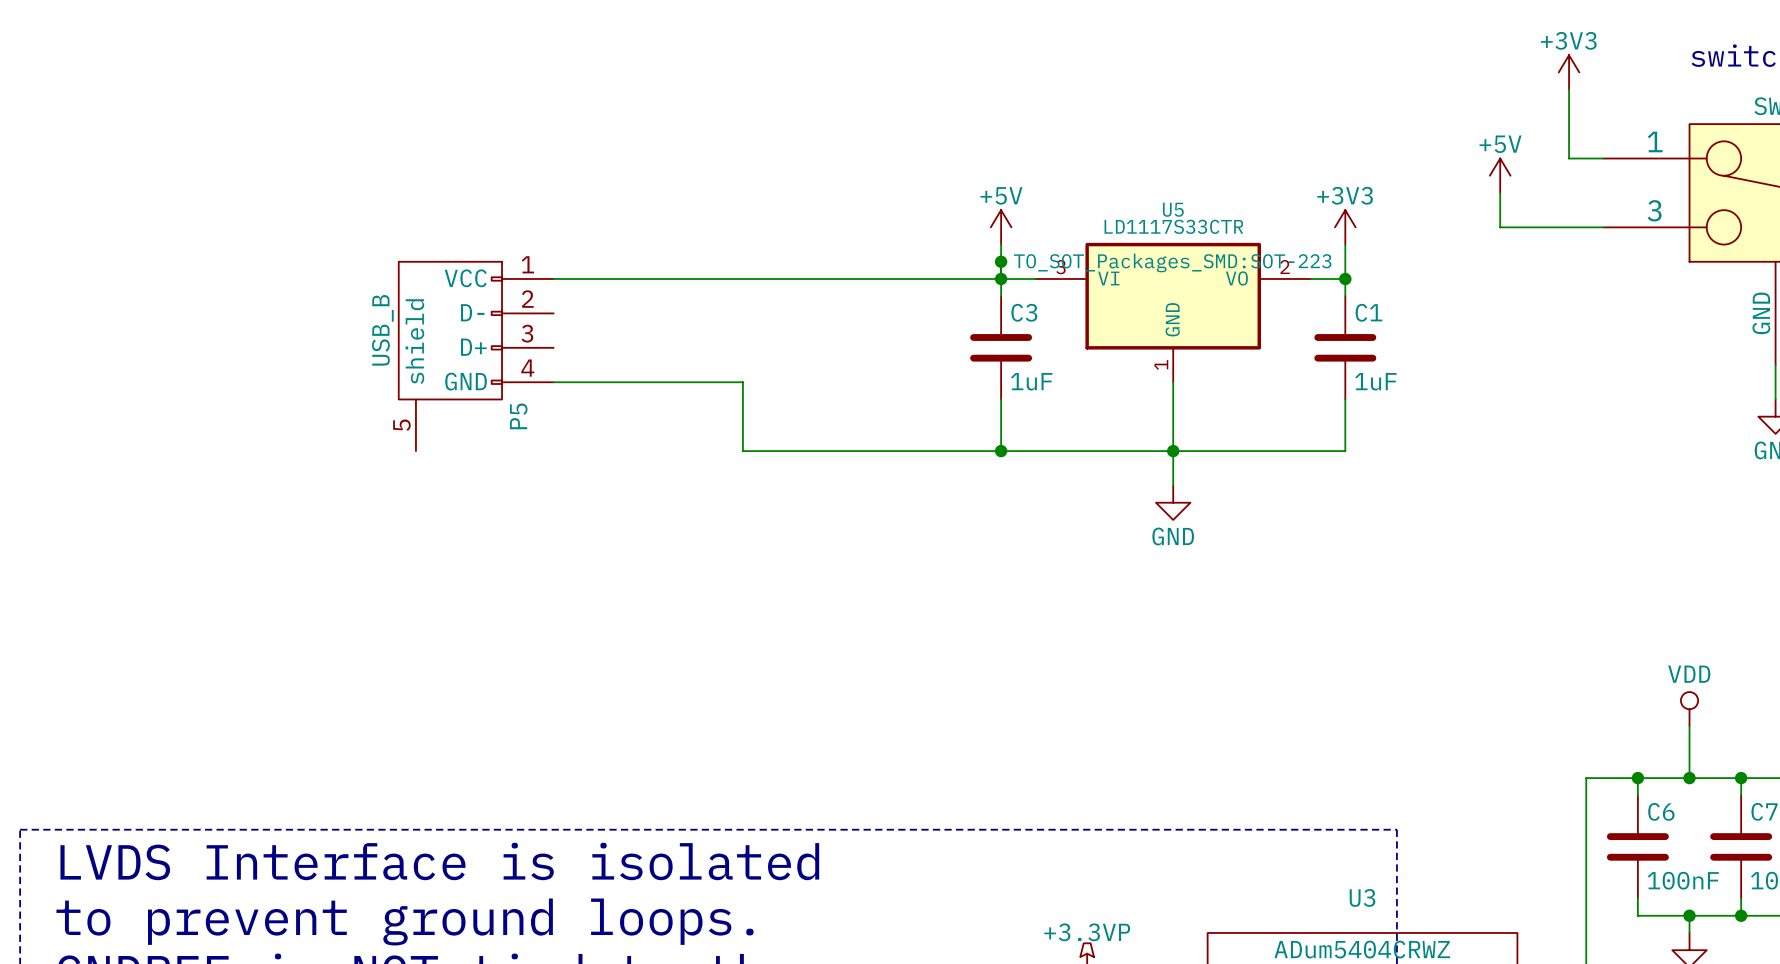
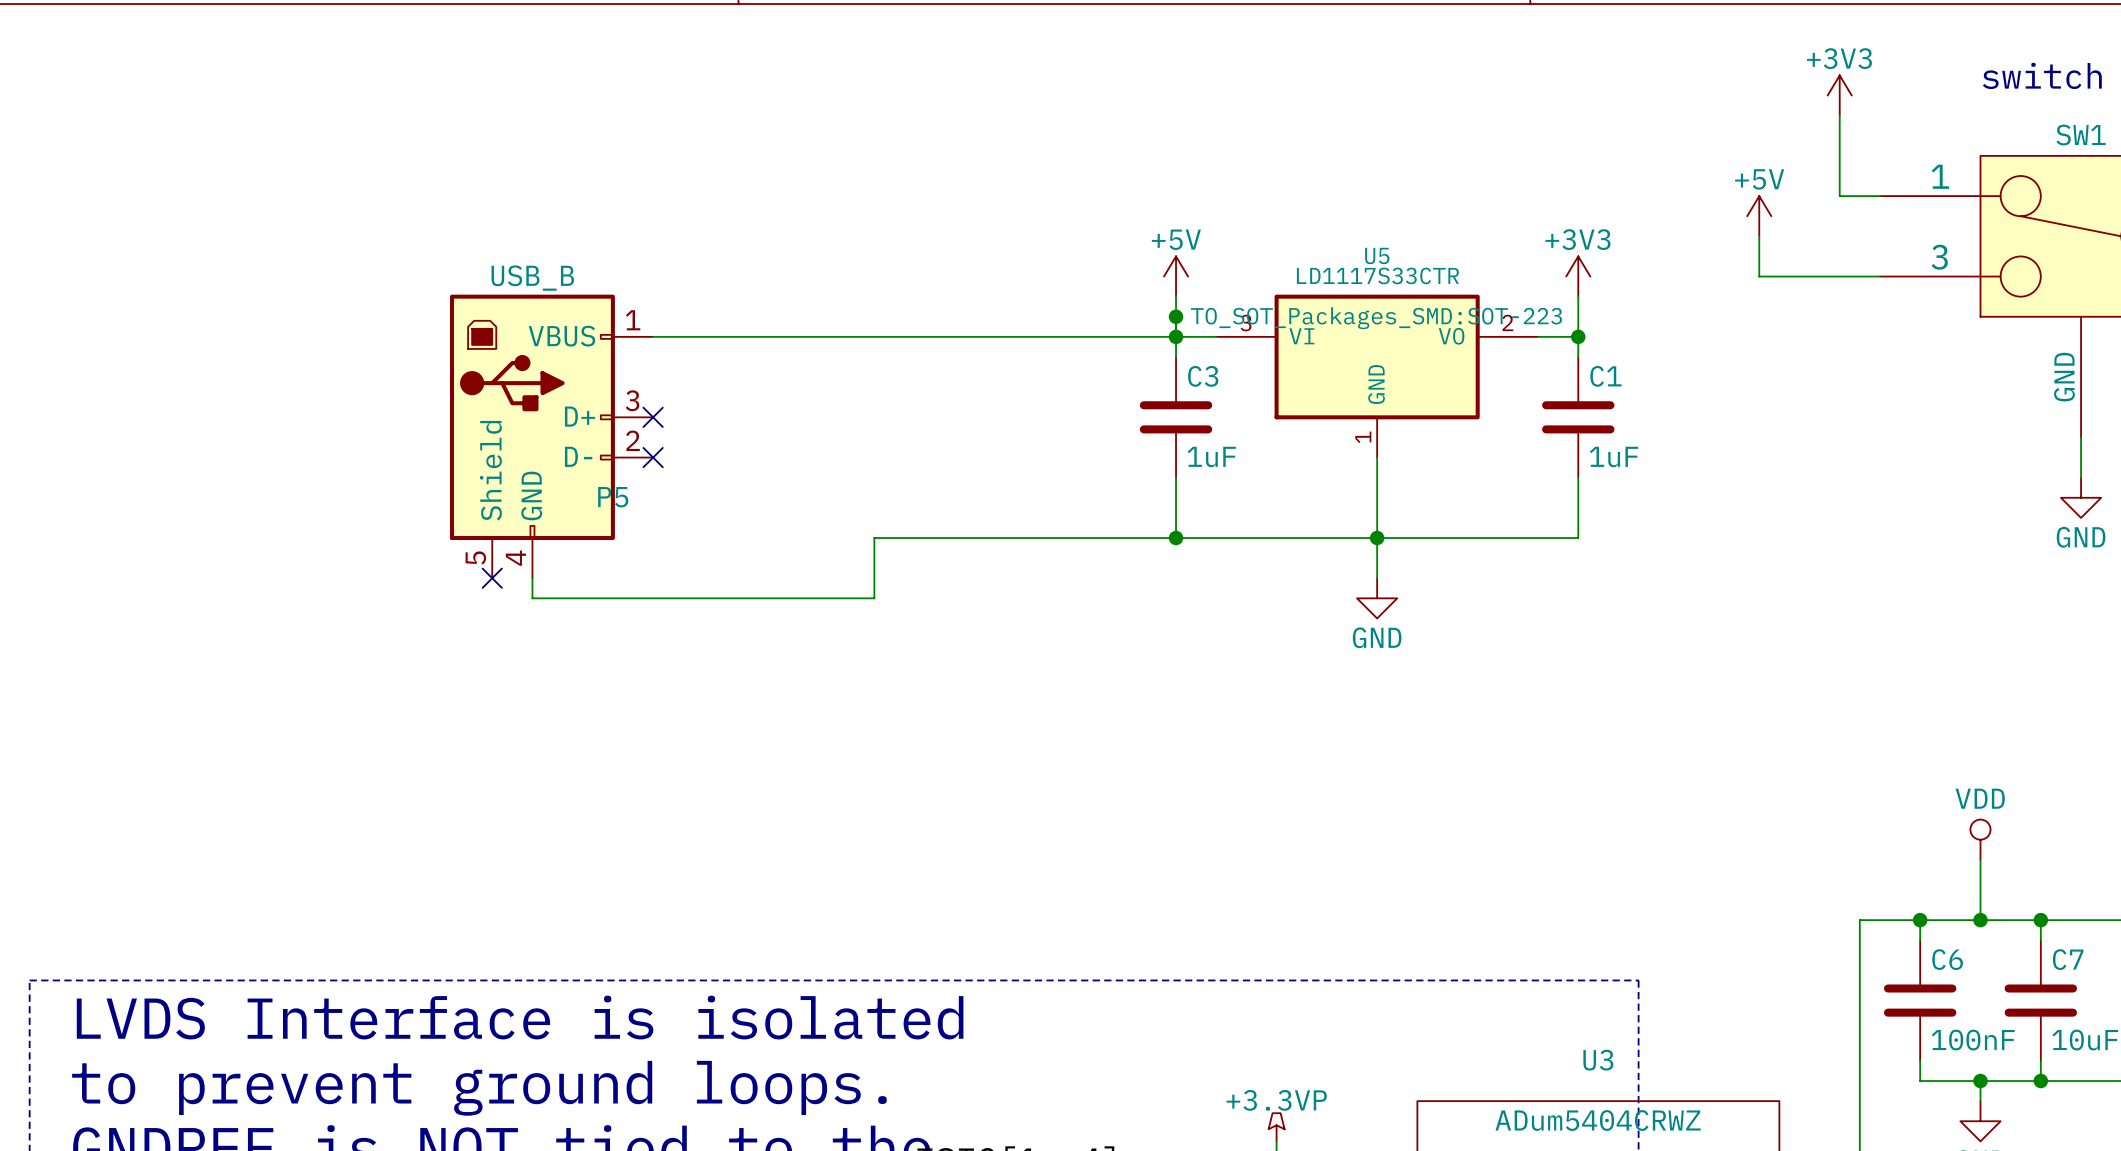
P5 symbol: [398, 261, 554, 452] -> [449, 294, 654, 579]
P5 value position: USB_B (382, 330) -> USB_B (532, 278)
no-connect mark: none -> (653, 417)
wire: (553, 382) (742, 382) (742, 451) -> (532, 578) (532, 598) (874, 598) (874, 538)
no-connect mark: none -> (653, 457)
no-connect mark: none -> (492, 578)

